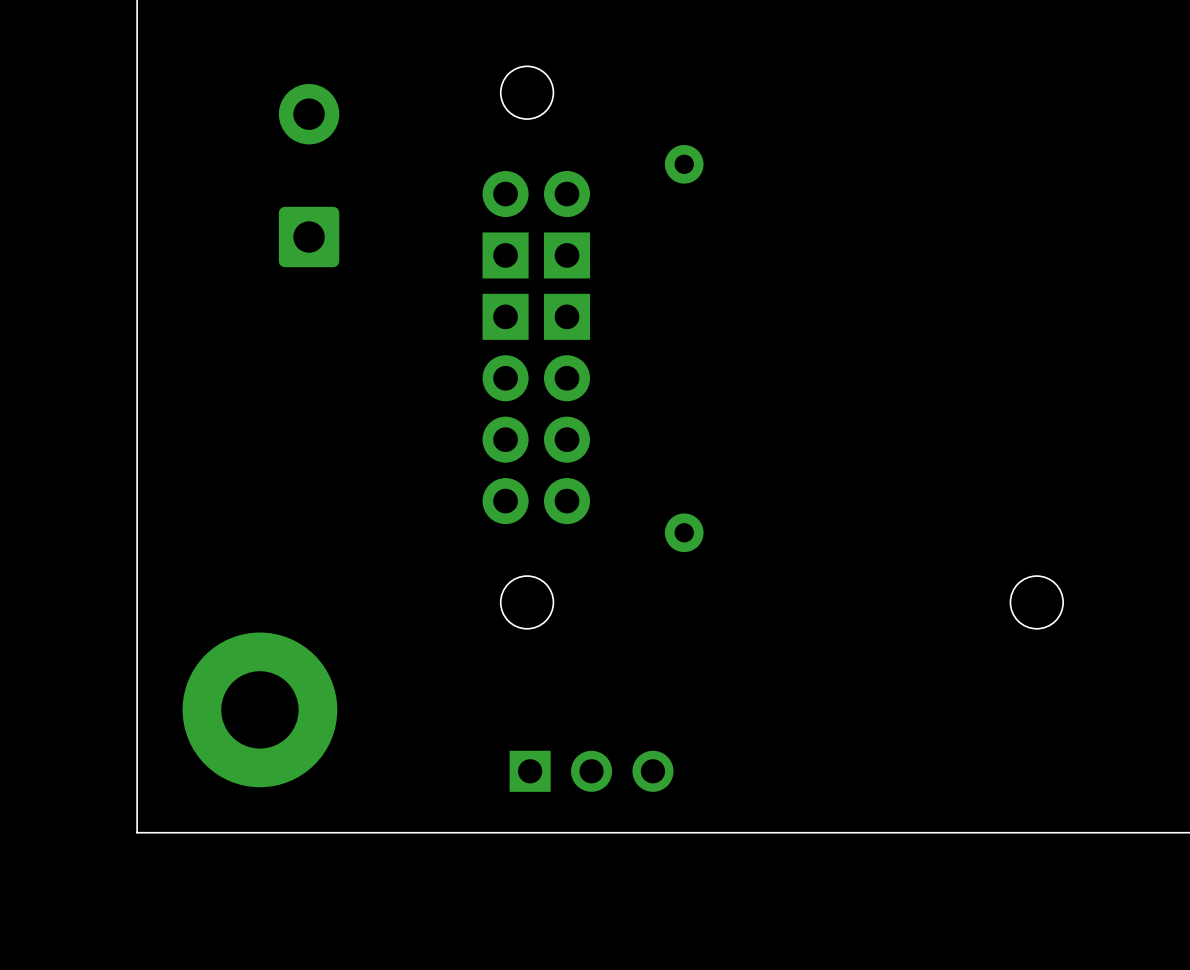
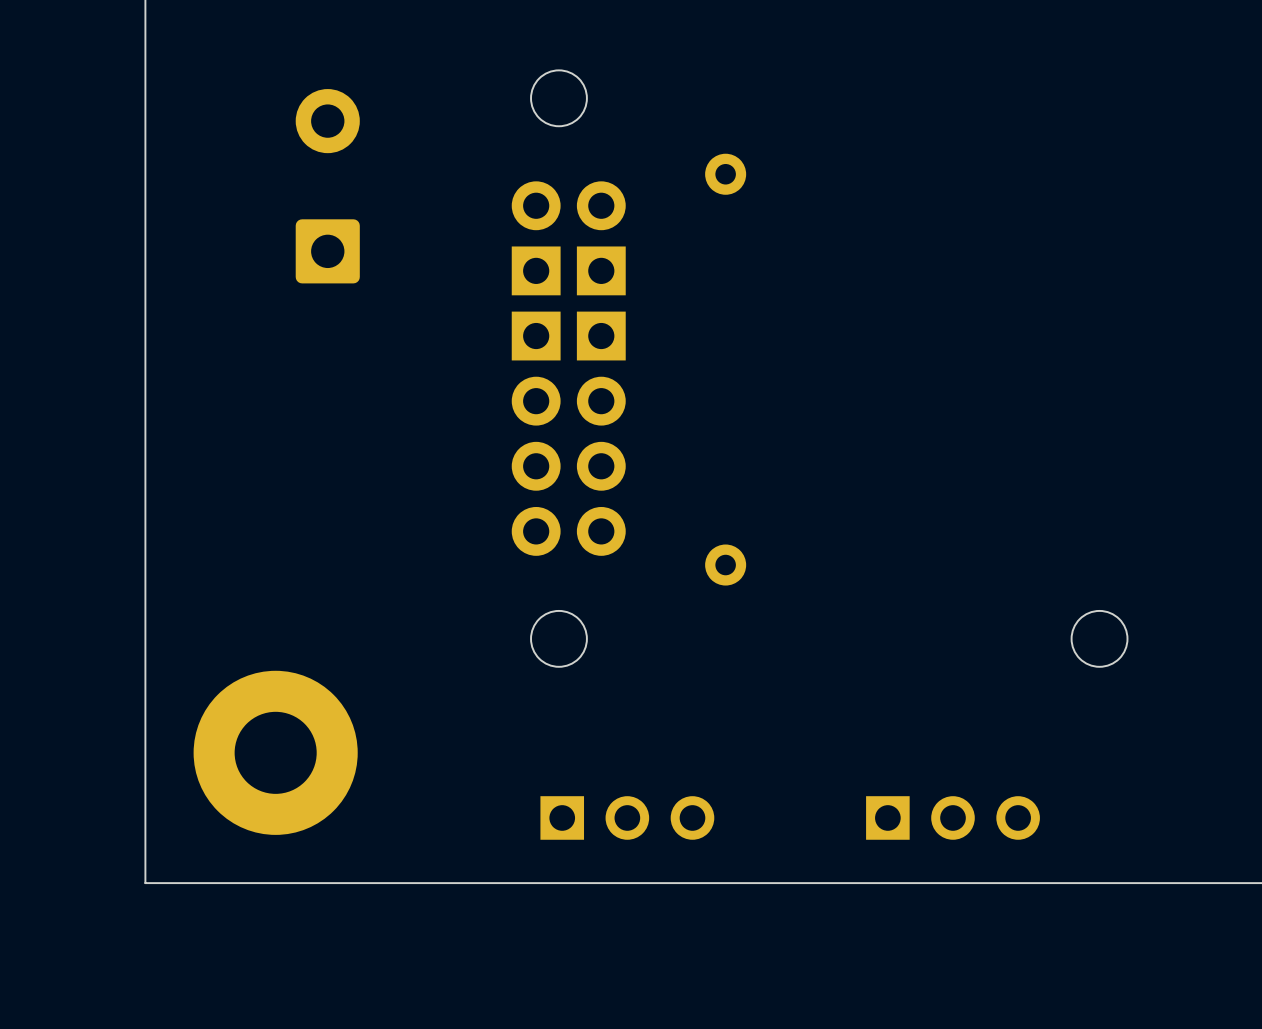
part: none -> (953, 817)

